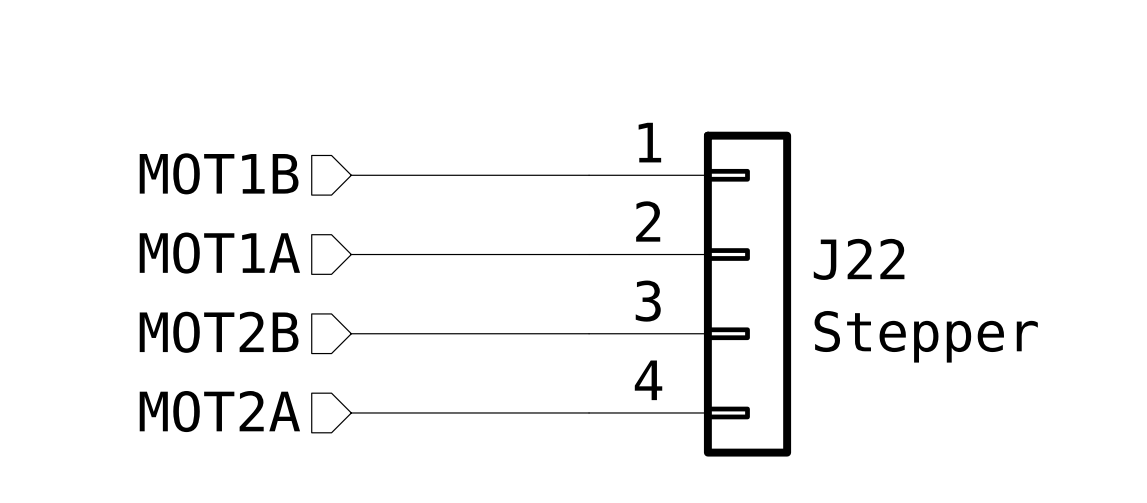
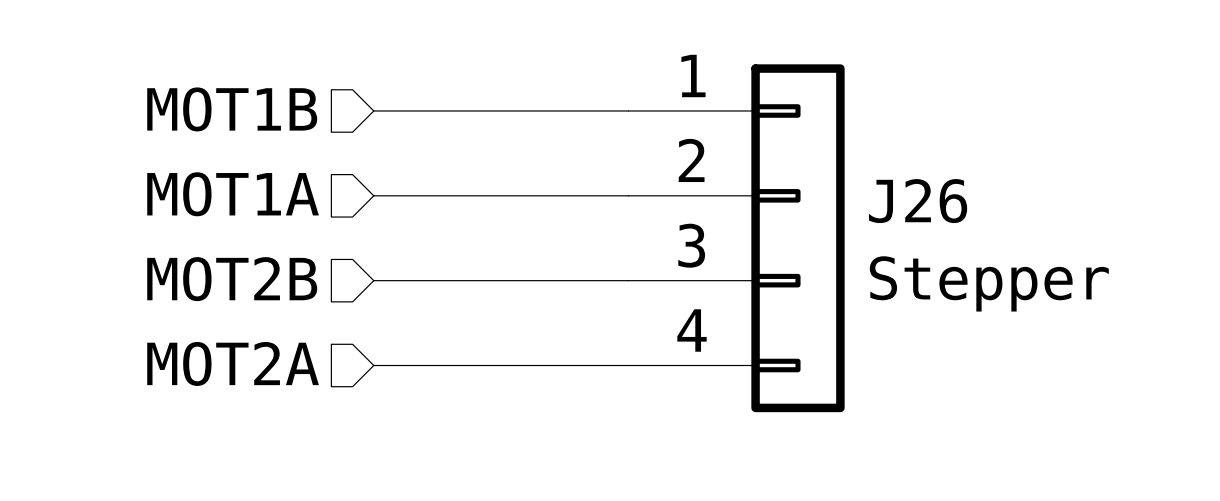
J22 name: J22 (859, 259) -> J26 (918, 201)

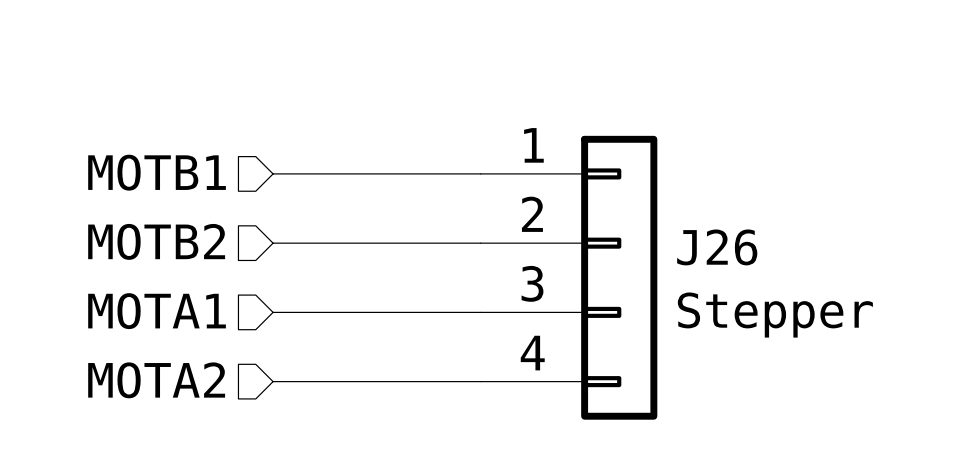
hierarchical label: MOT1B (232, 109) -> MOTB1 (157, 172)
hierarchical label: MOT1A (233, 194) -> MOTB2 (156, 241)
hierarchical label: MOT2B (232, 279) -> MOTA1 (157, 311)
hierarchical label: MOT2A (233, 363) -> MOTA2 (156, 380)

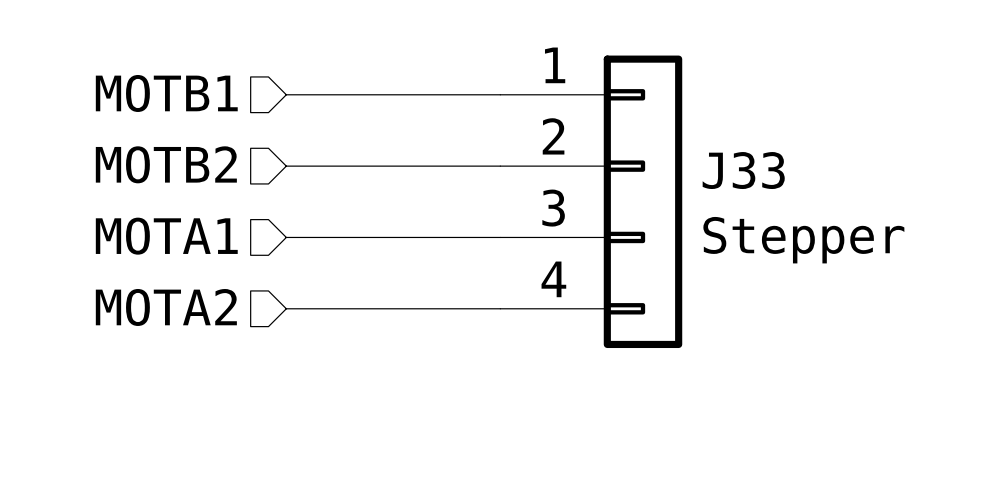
J26 name: J26 (717, 247) -> J33 (743, 170)

